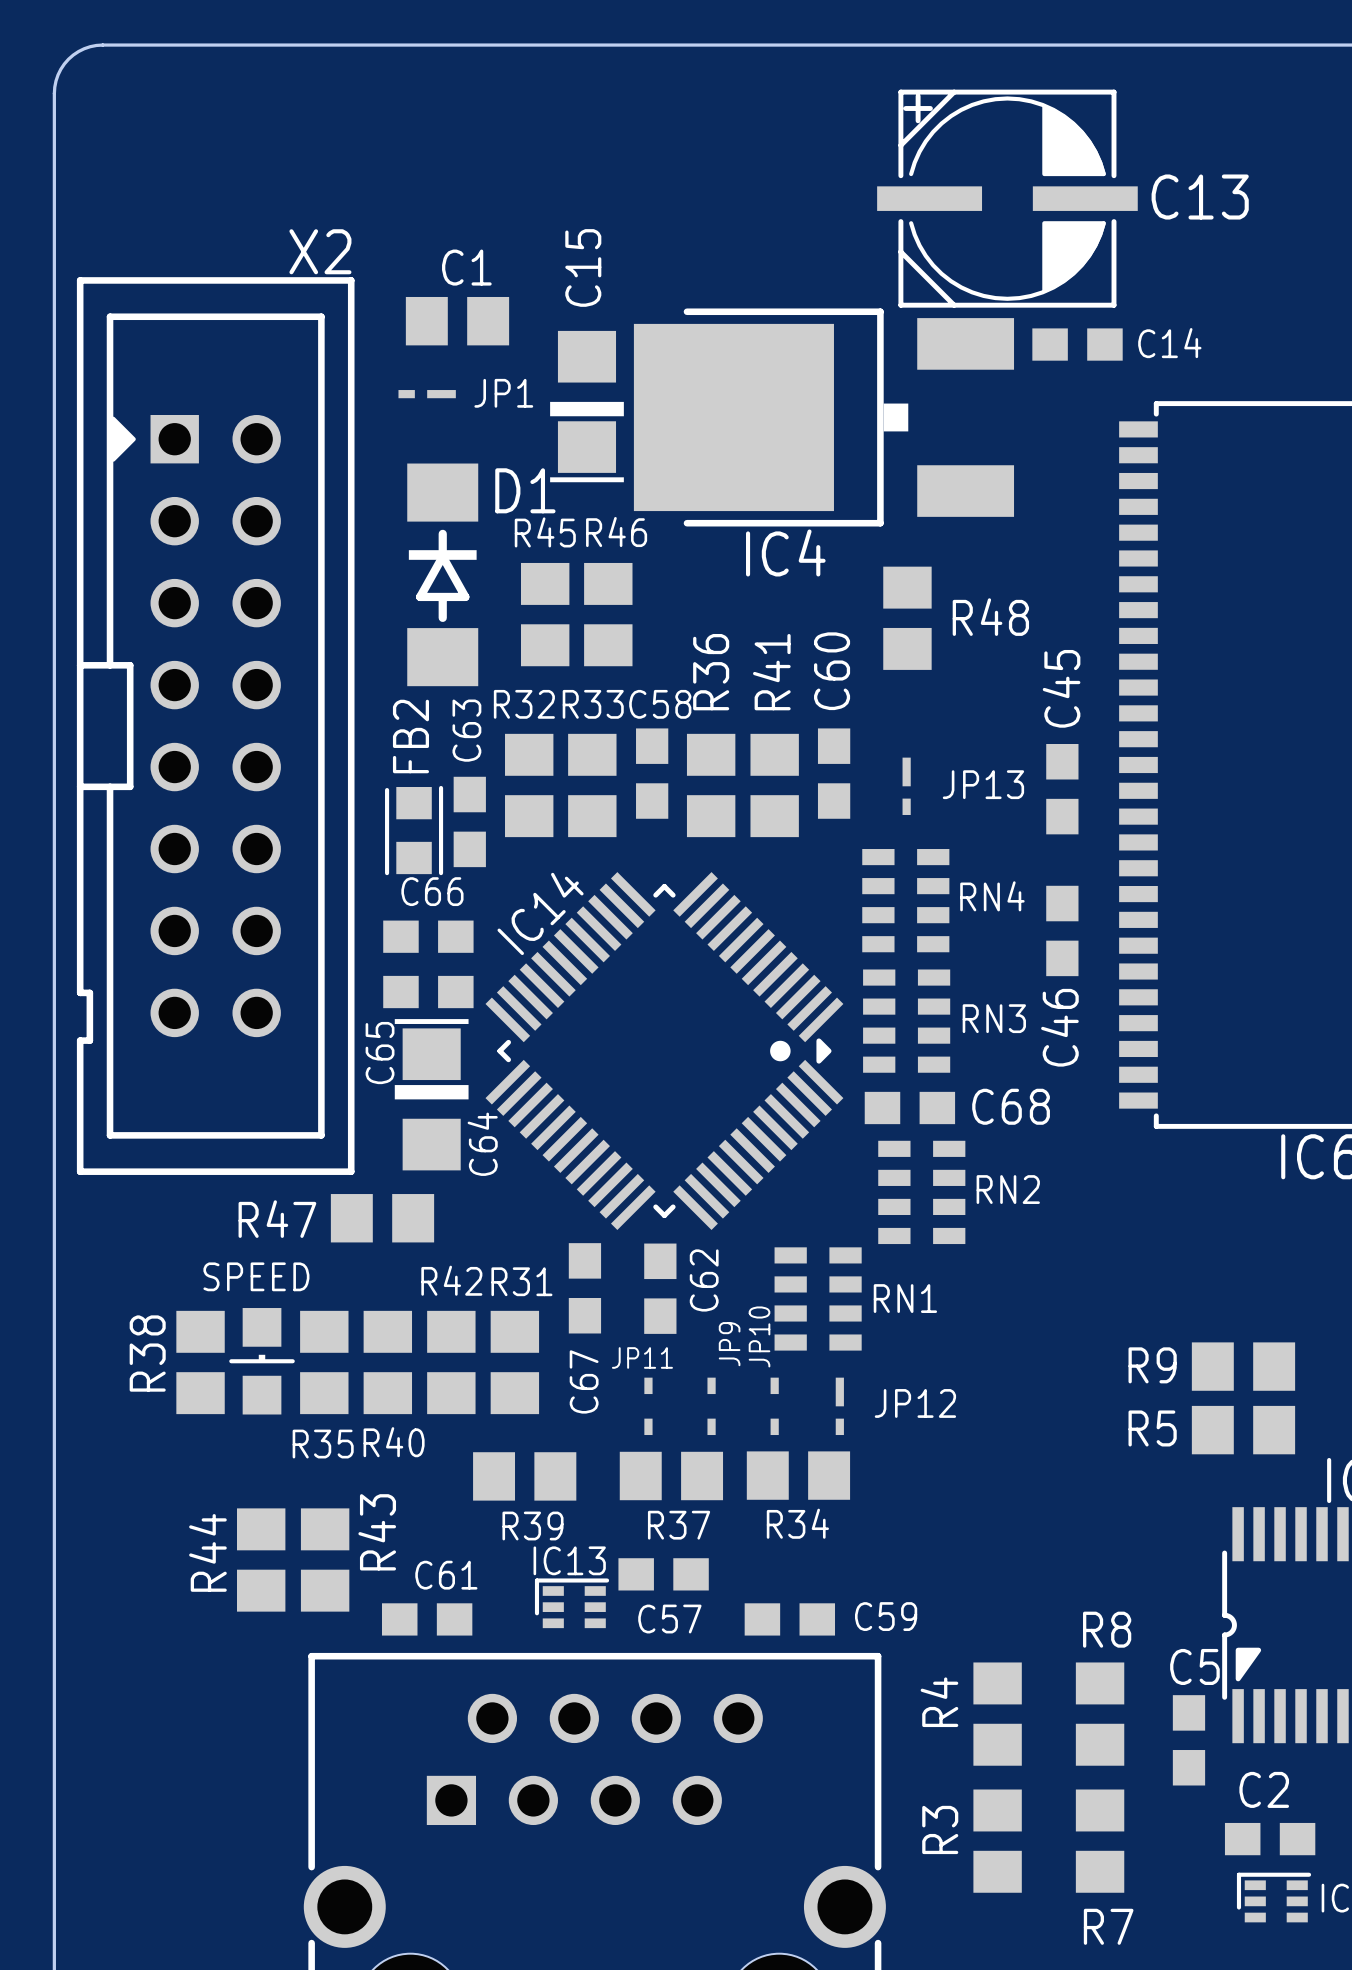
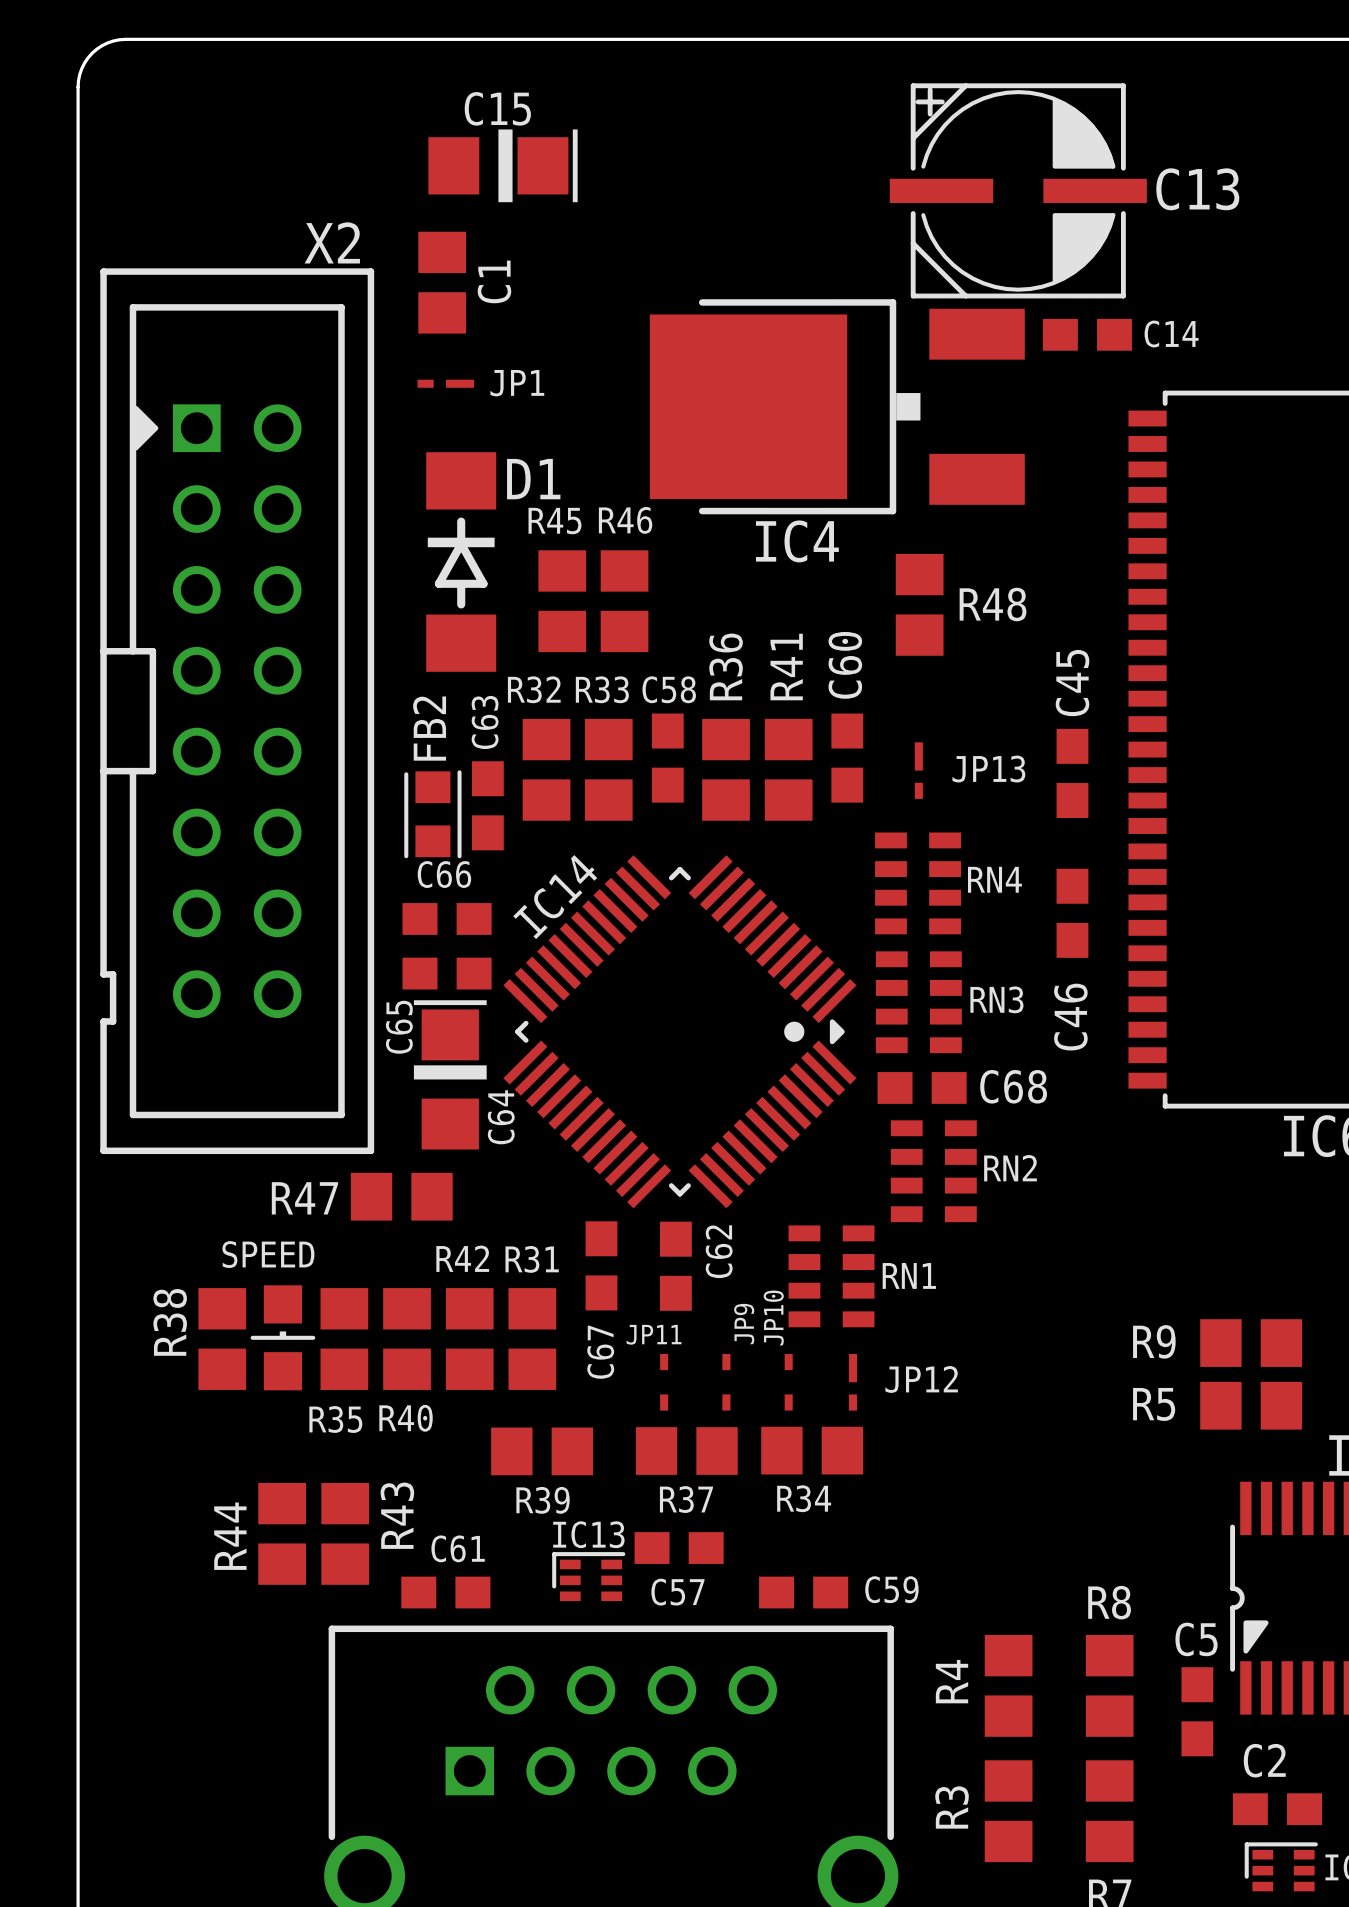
C15 name position: C15 (583, 267) -> C15 (497, 108)
C1 rotation: 0° (457, 321) -> 90° clockwise (442, 282)
C15 rotation: 0° (586, 406) -> 90° counterclockwise (503, 165)
C15 position: (586, 406) -> (503, 165)

